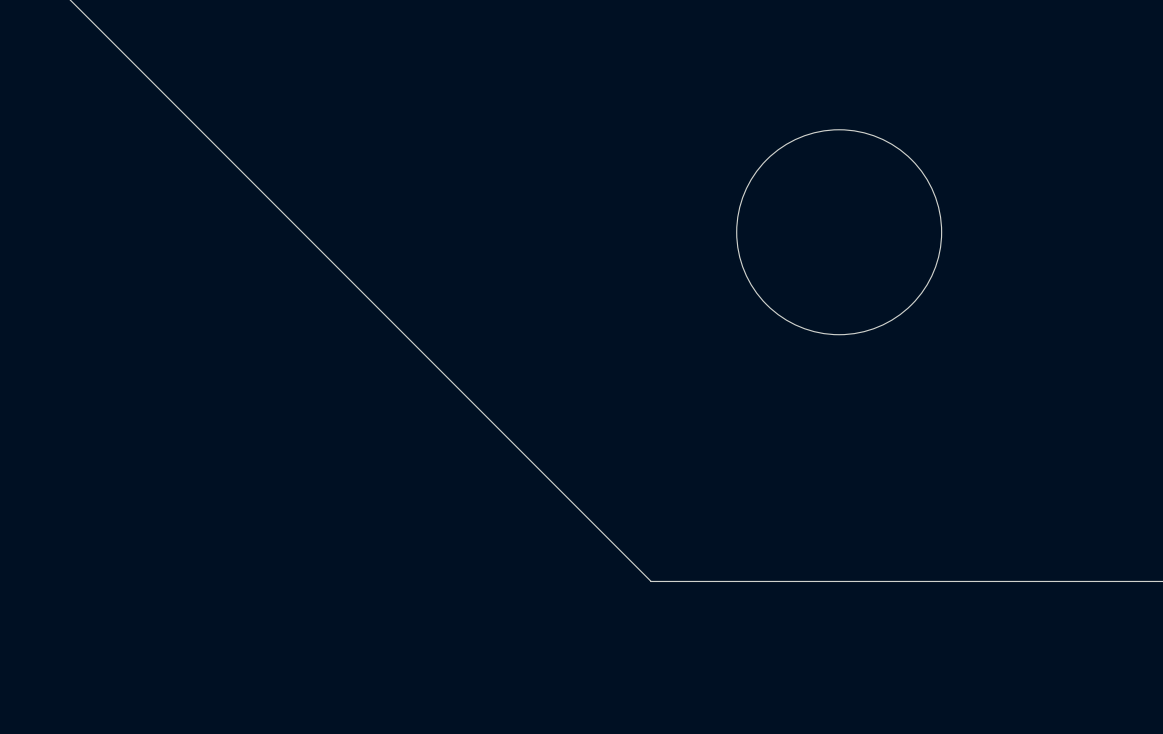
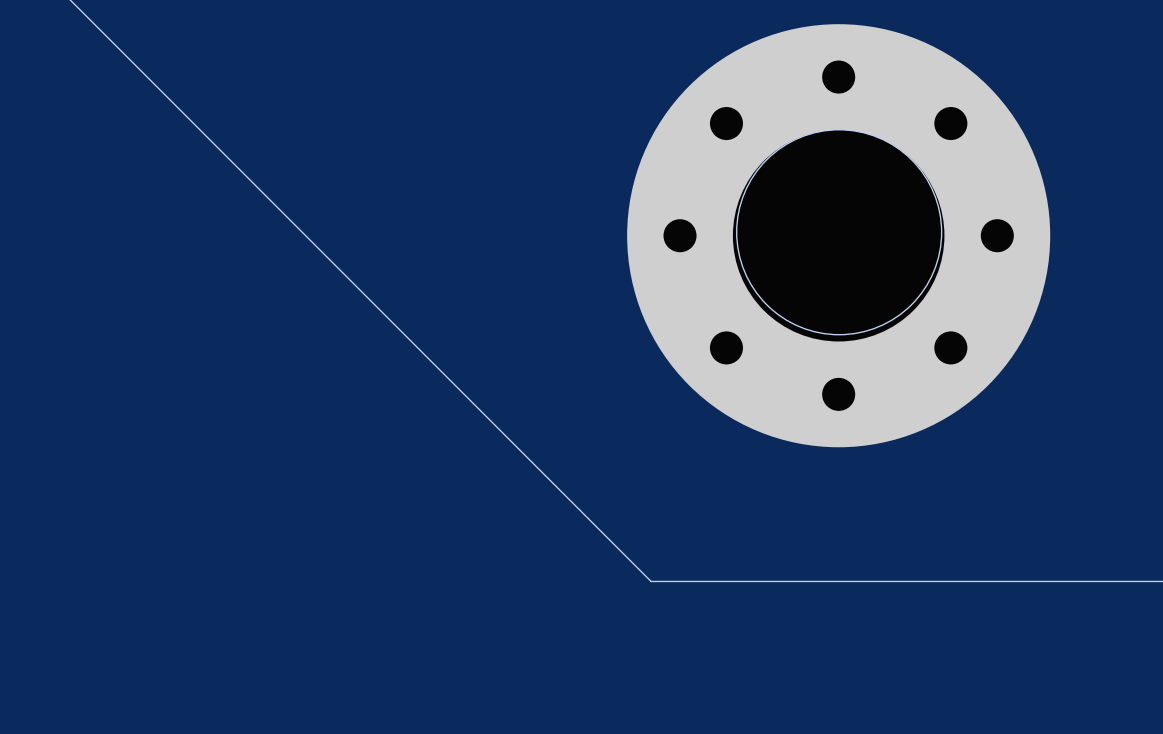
part: none -> (838, 235)

